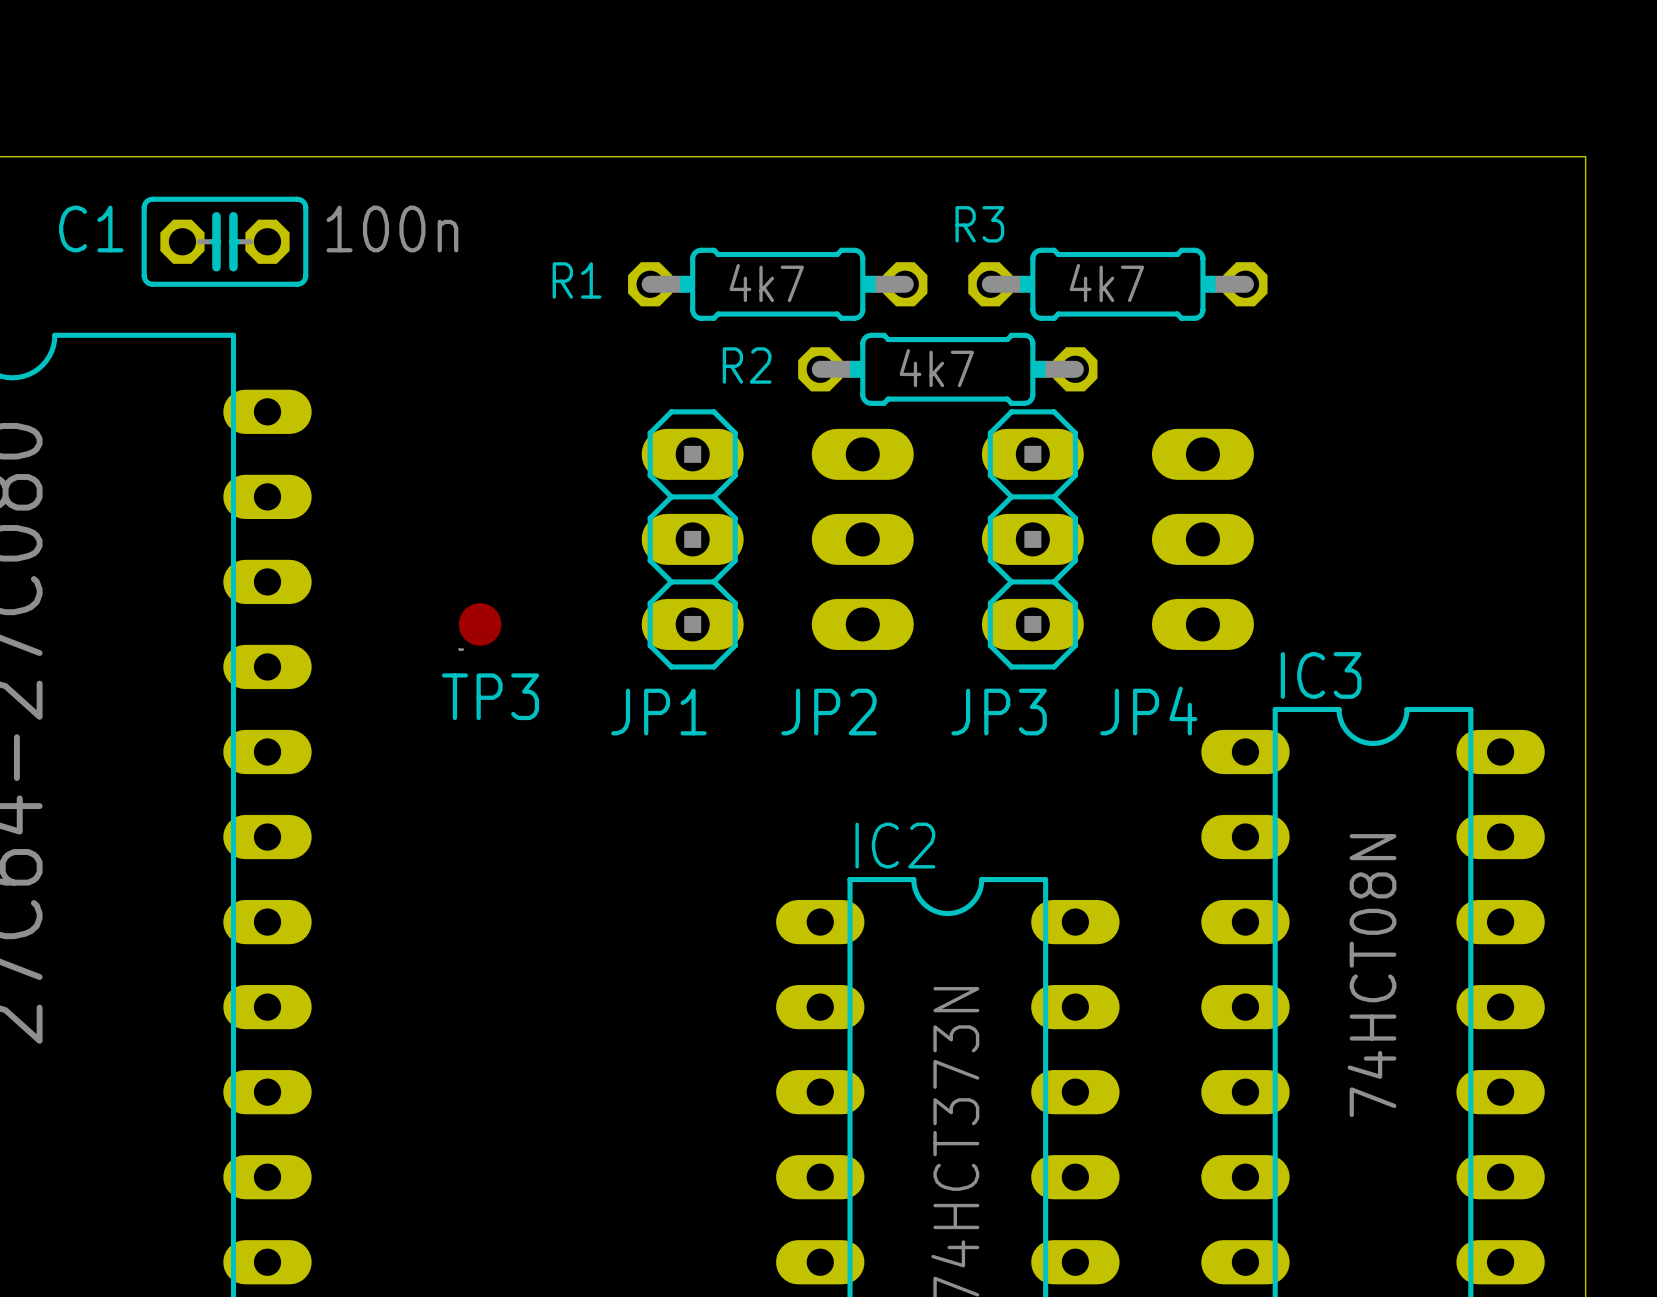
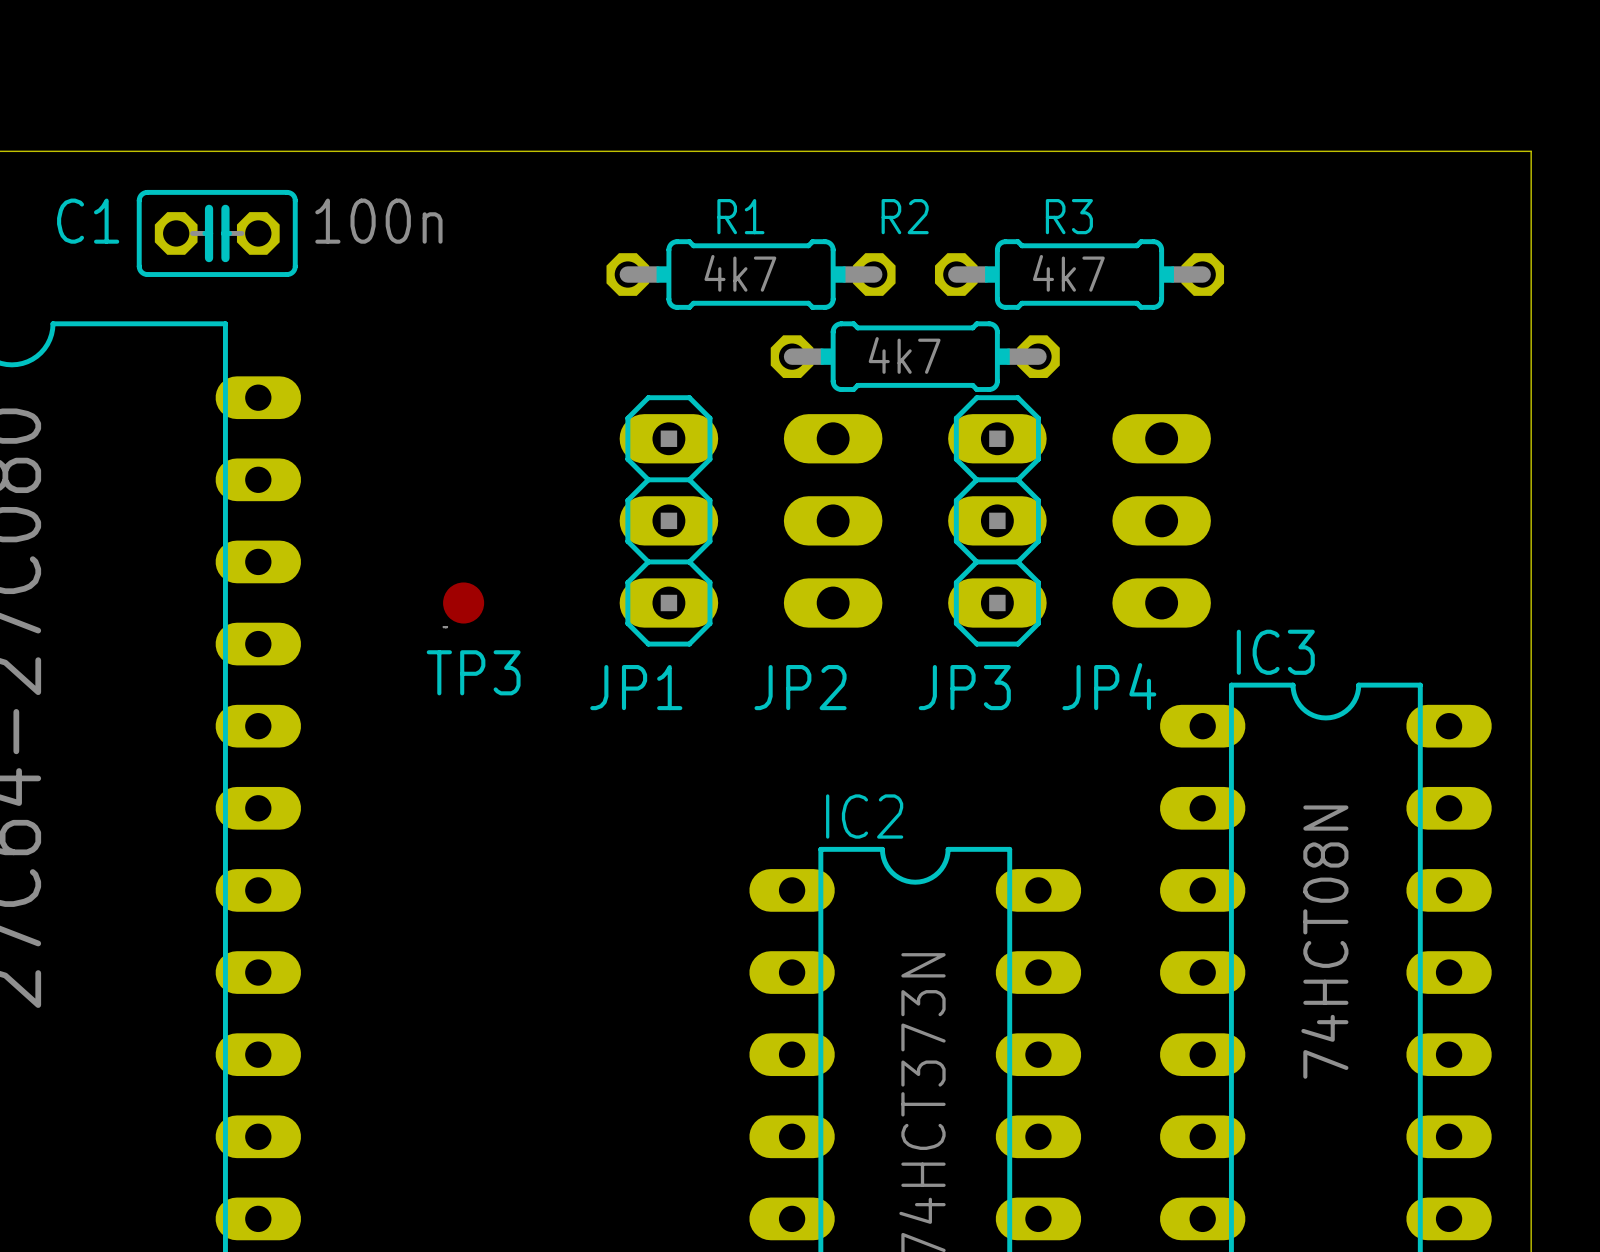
R3 name position: R3 (979, 224) -> R3 (1069, 216)
R1 name position: R1 (577, 280) -> R1 (740, 216)
R2 name position: R2 (747, 365) -> R2 (905, 216)

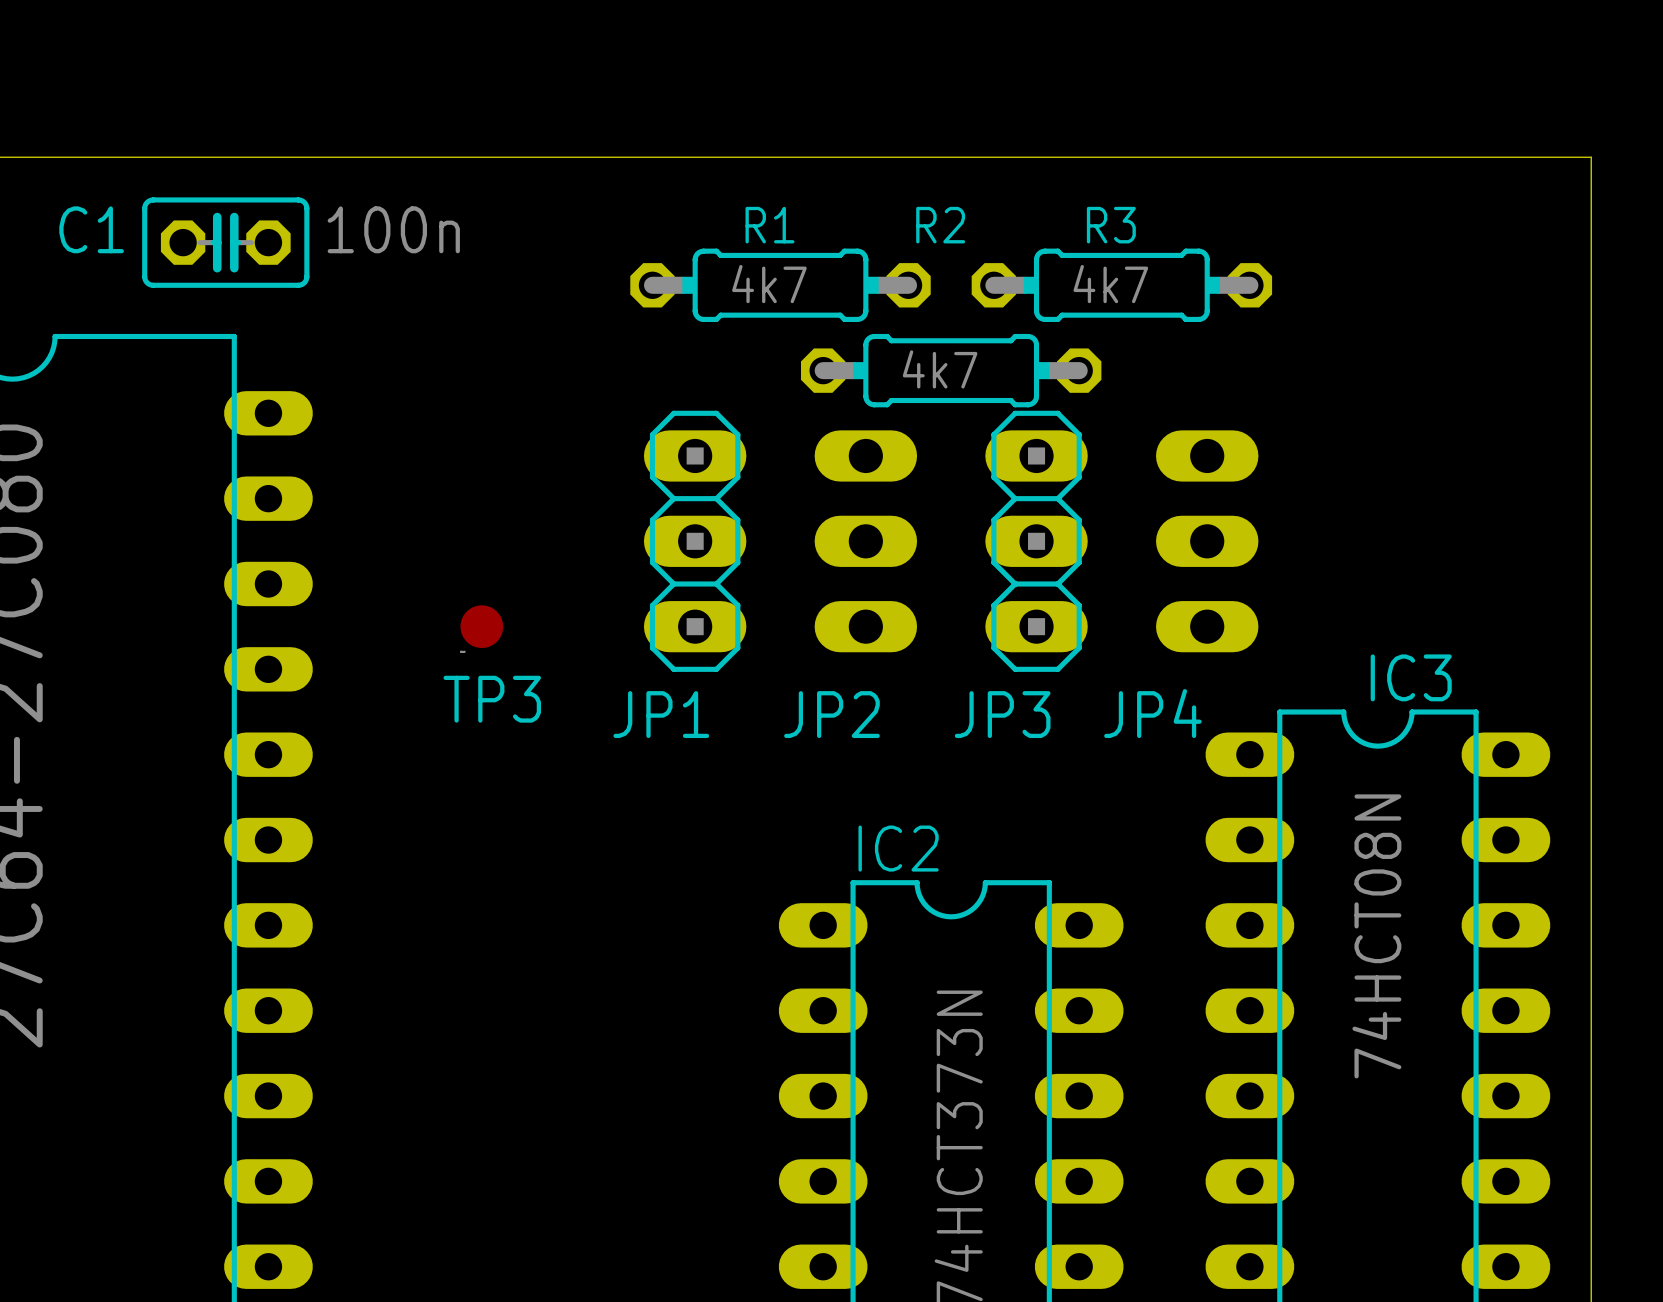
IC3 name position: IC3 (1275, 652) -> IC3 (1411, 677)
IC3 value position: 74HCT08N (1324, 942) -> 74HCT08N (1376, 936)

